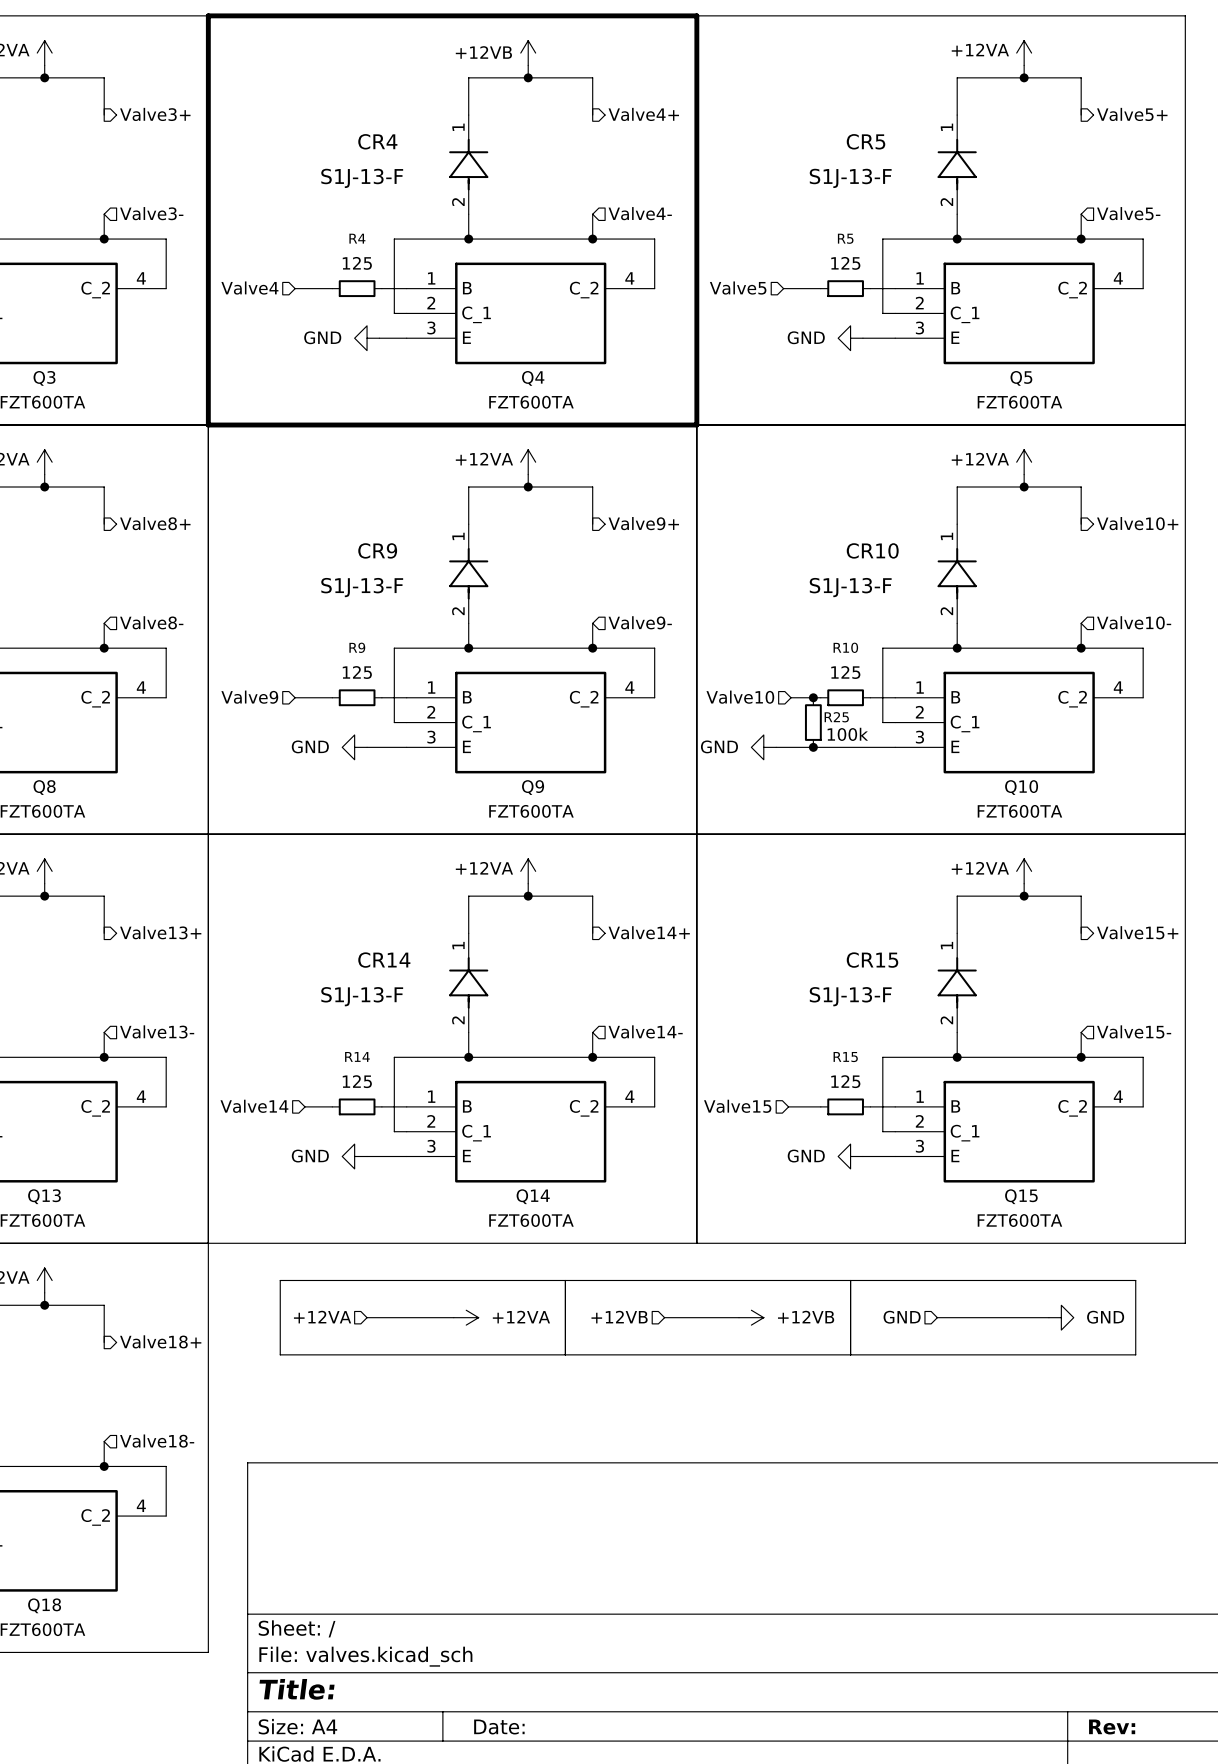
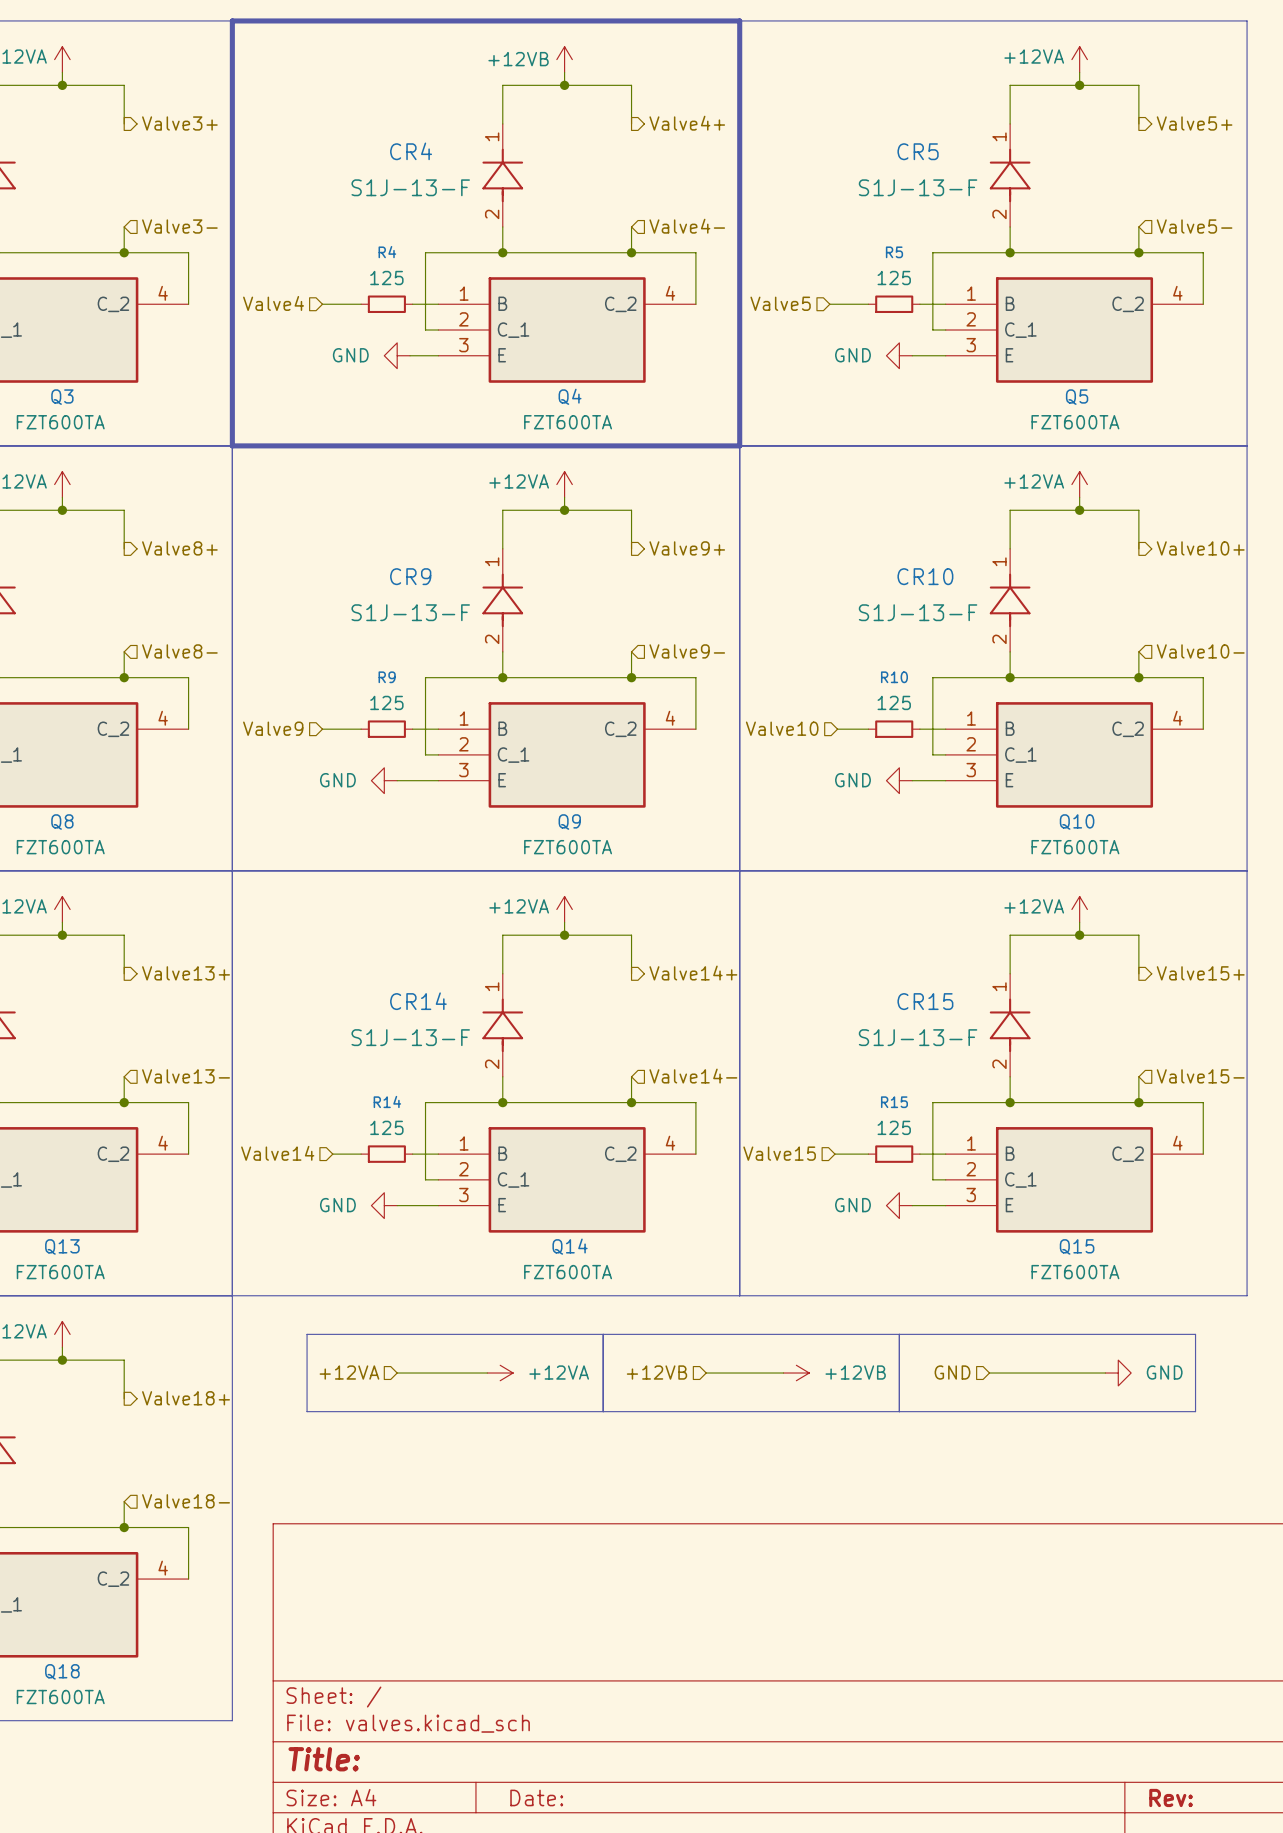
junction: (813, 697) -> none
R25: 100k (813, 722) -> none
power symbol position: GND (763, 747) -> GND (899, 780)
wire: (776, 747) (862, 747) -> none
junction: (813, 747) -> none

